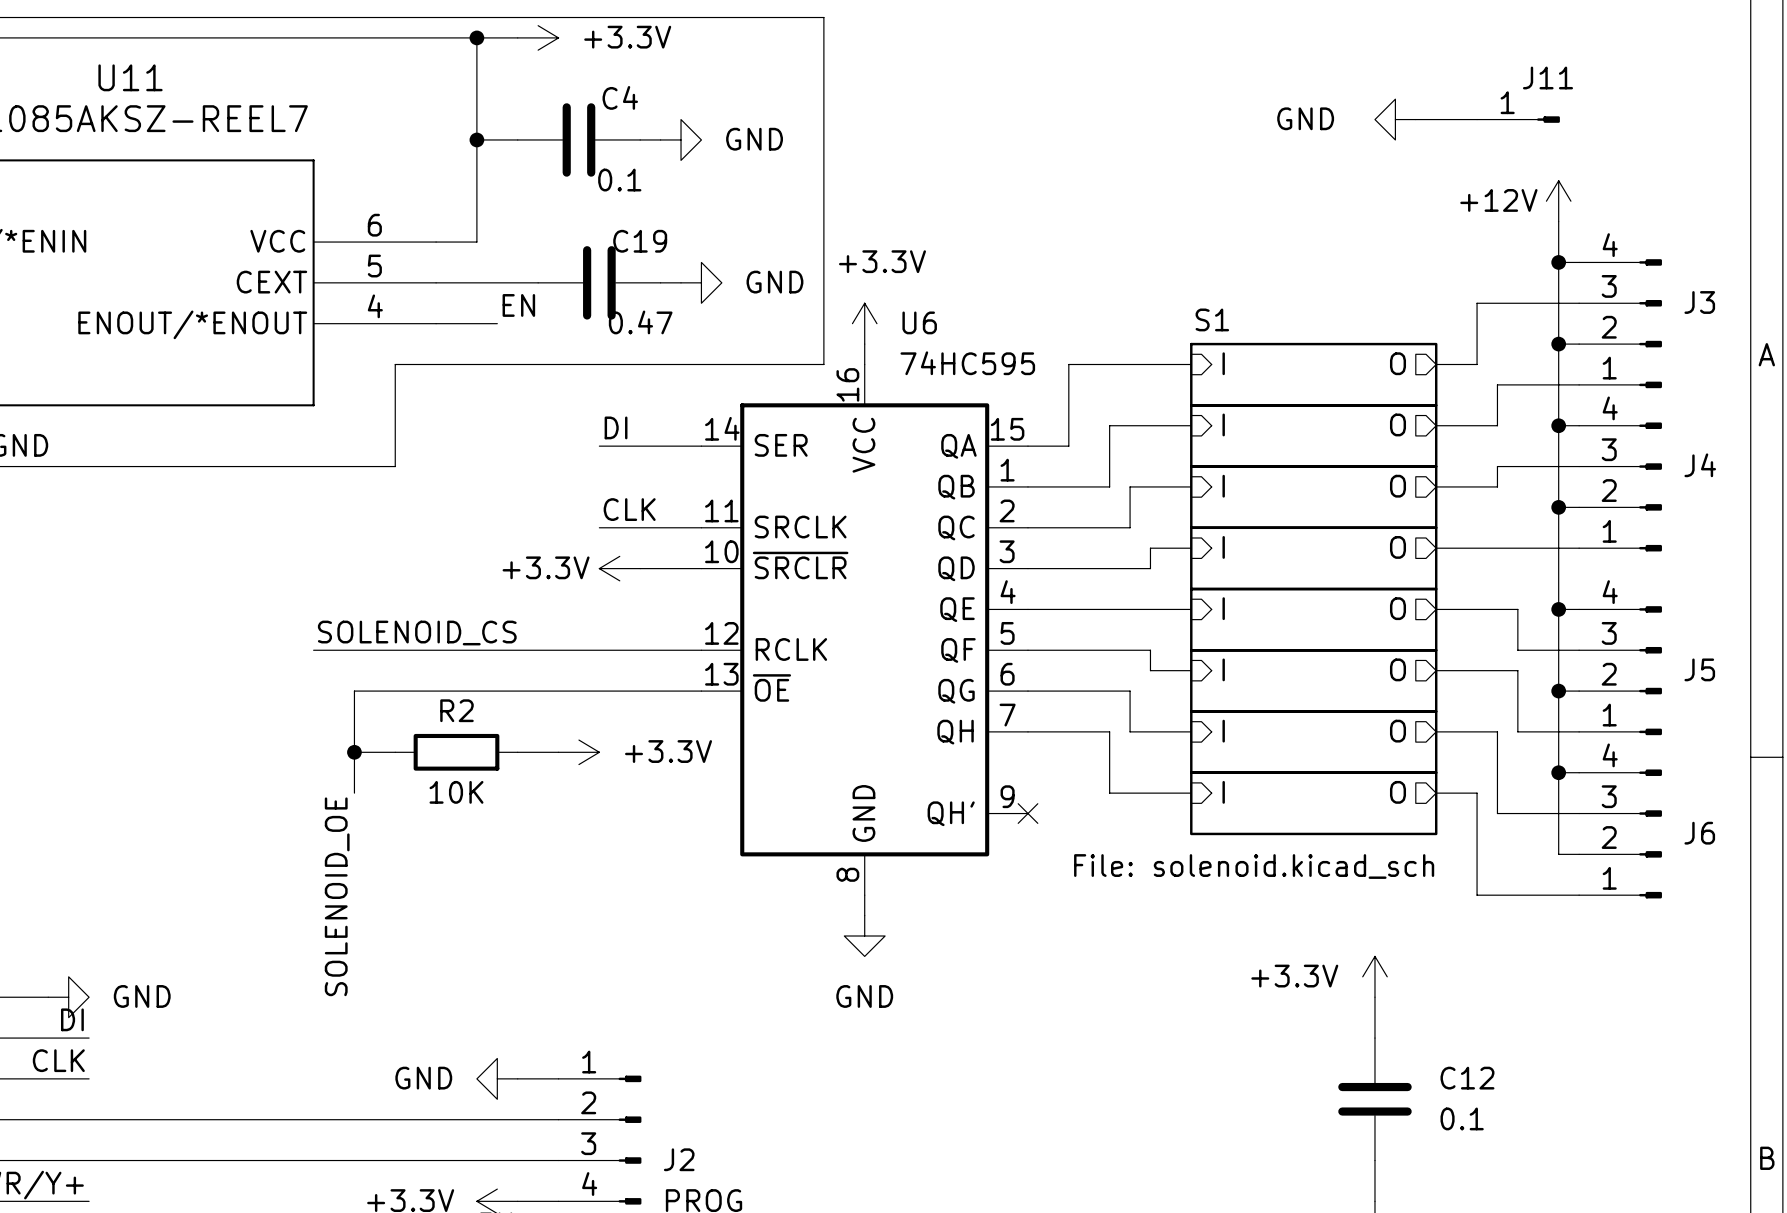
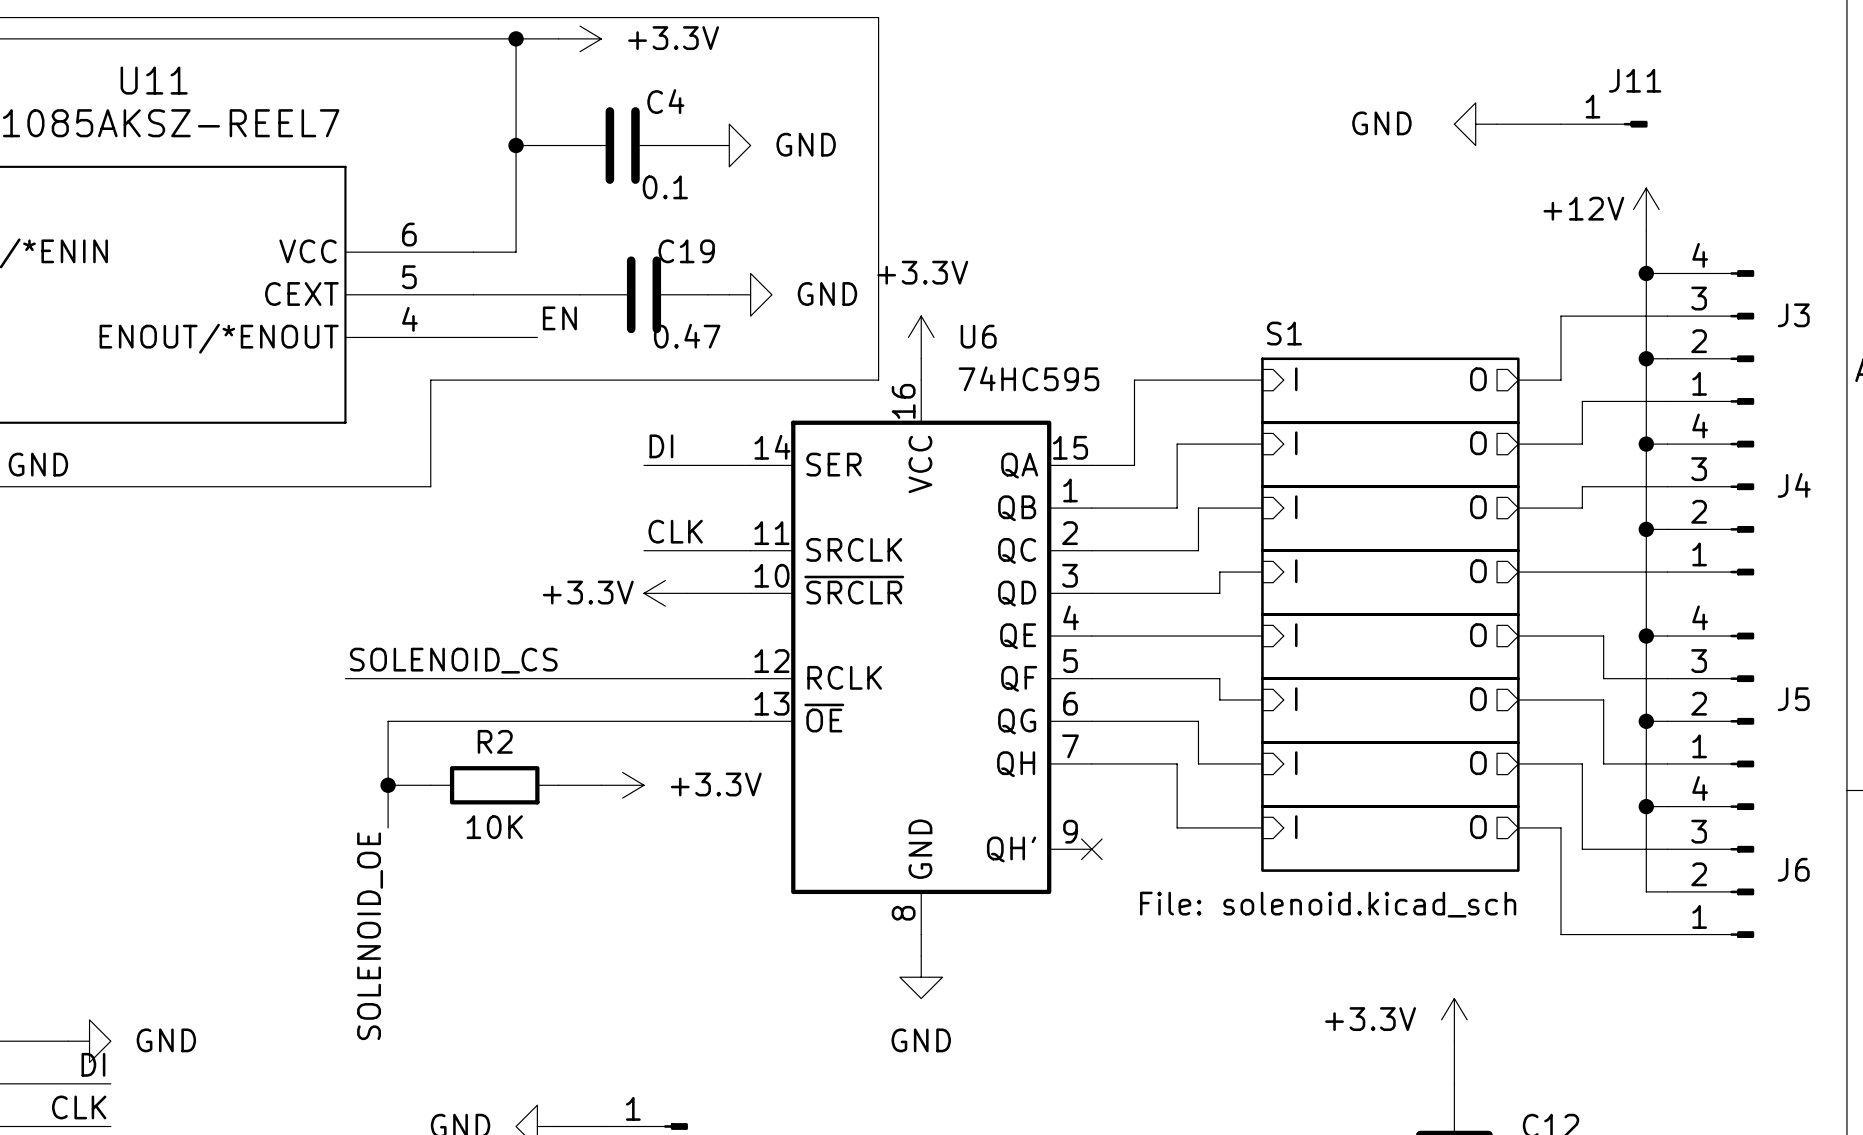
power symbol text position: +3.3V (882, 261) -> +3.3V (922, 272)

